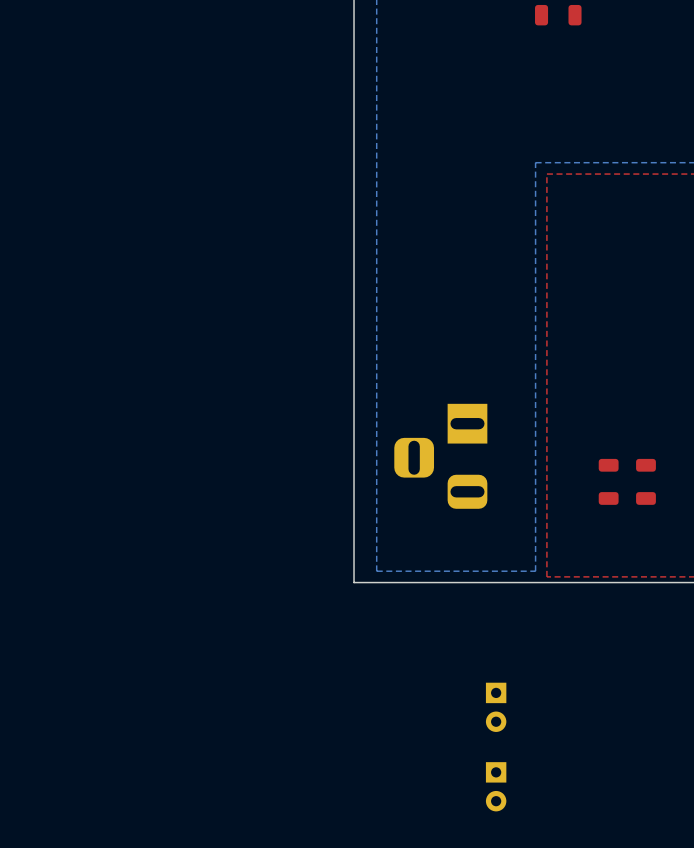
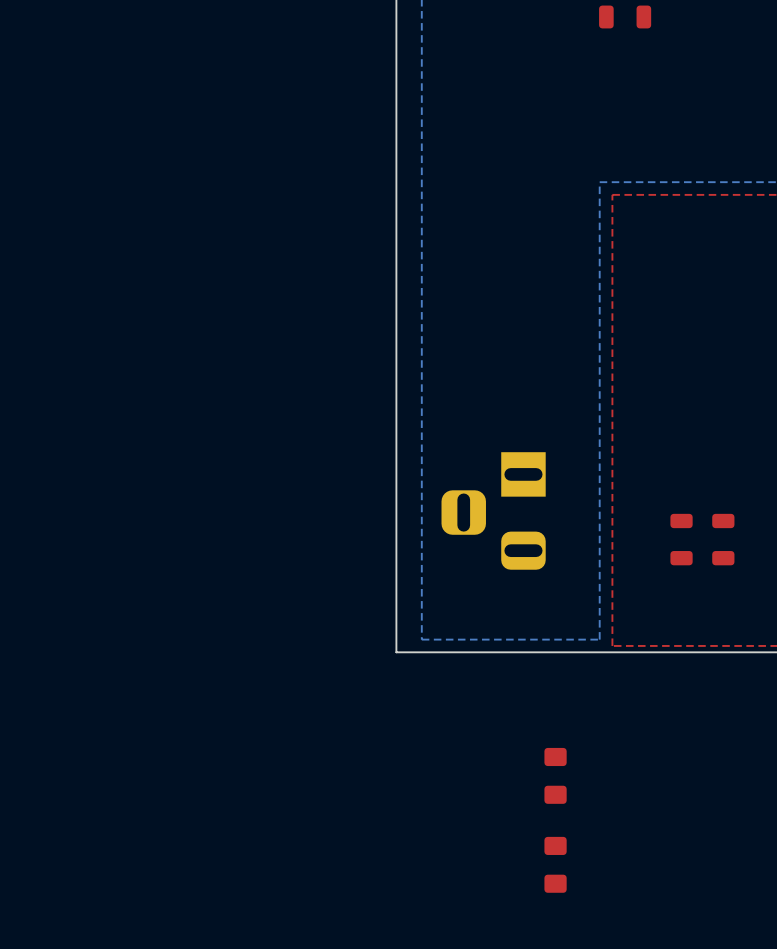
part: none -> (555, 775)
part: (496, 707) -> none
part: none -> (555, 864)
part: (496, 786) -> none

